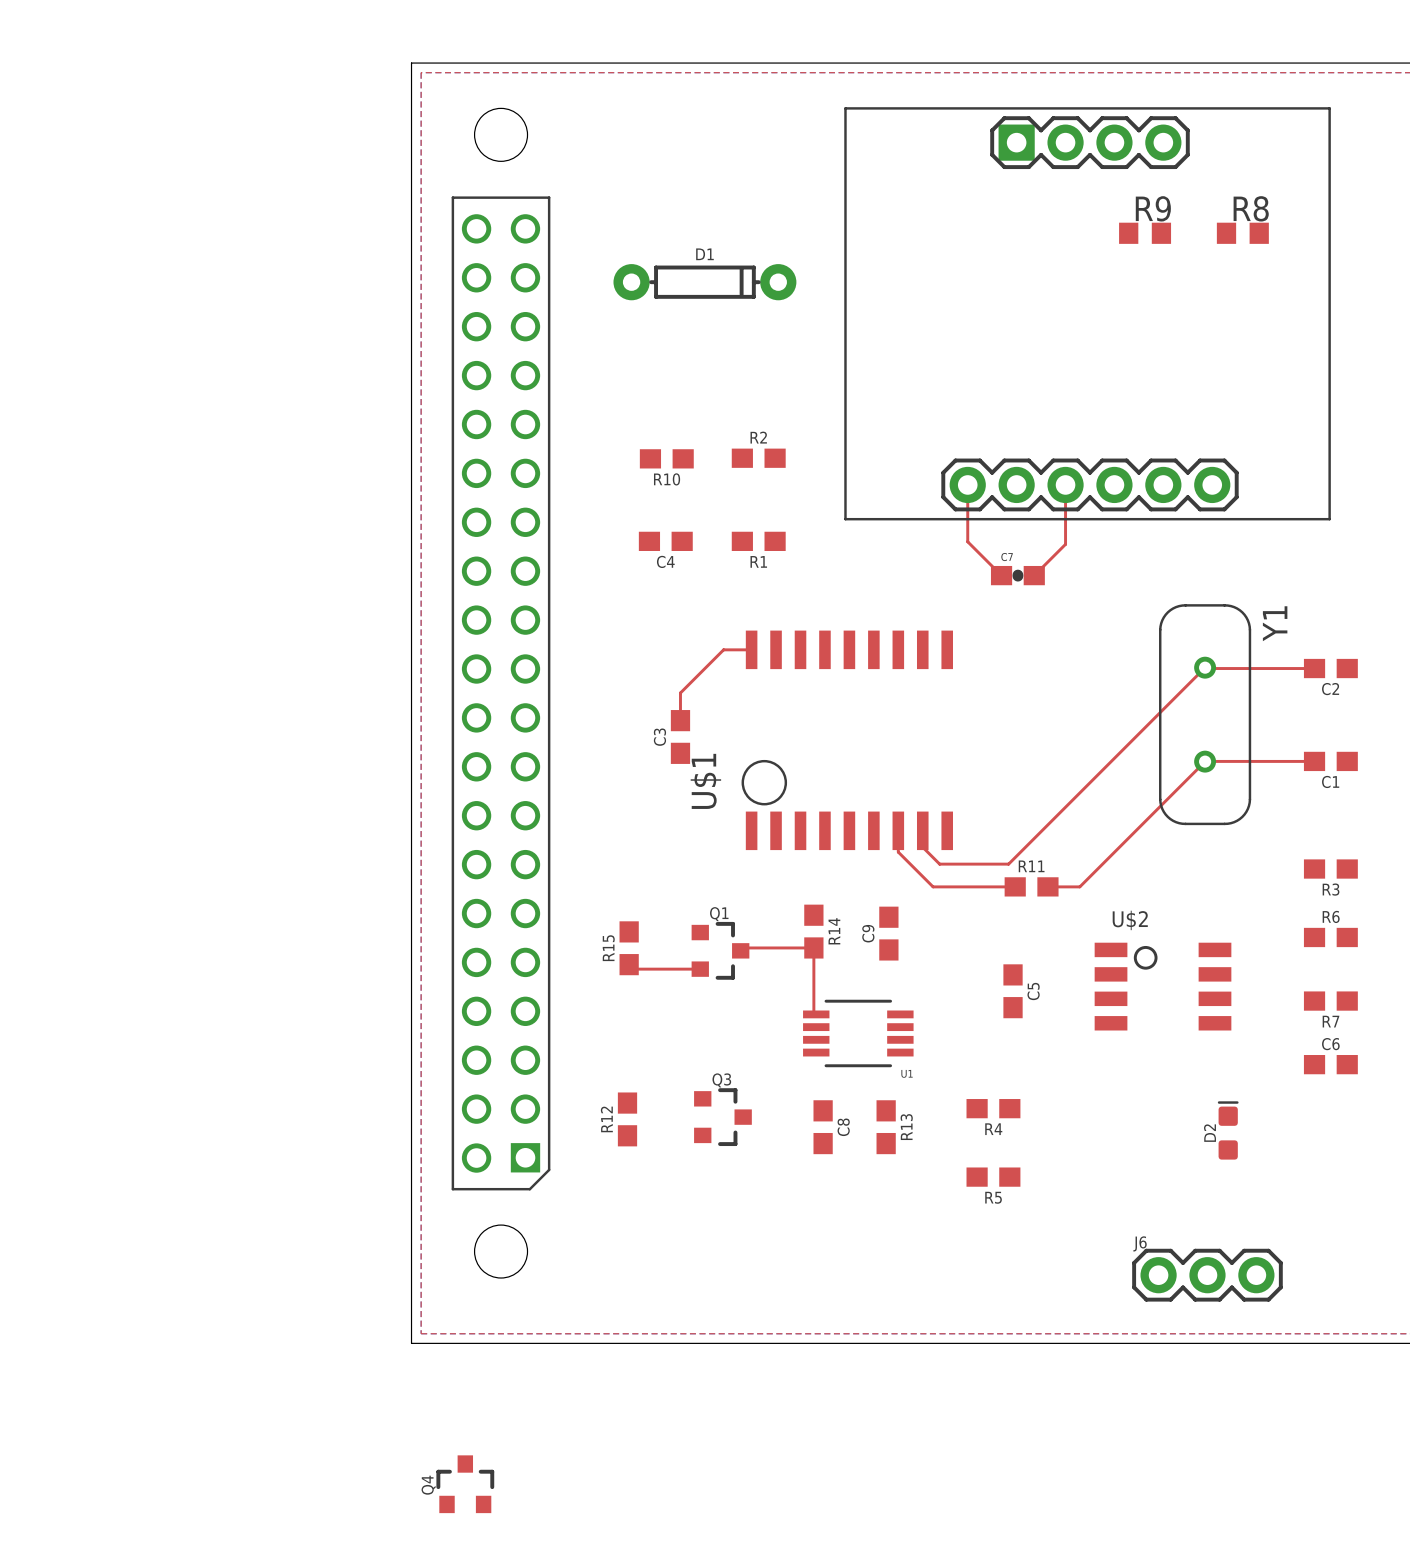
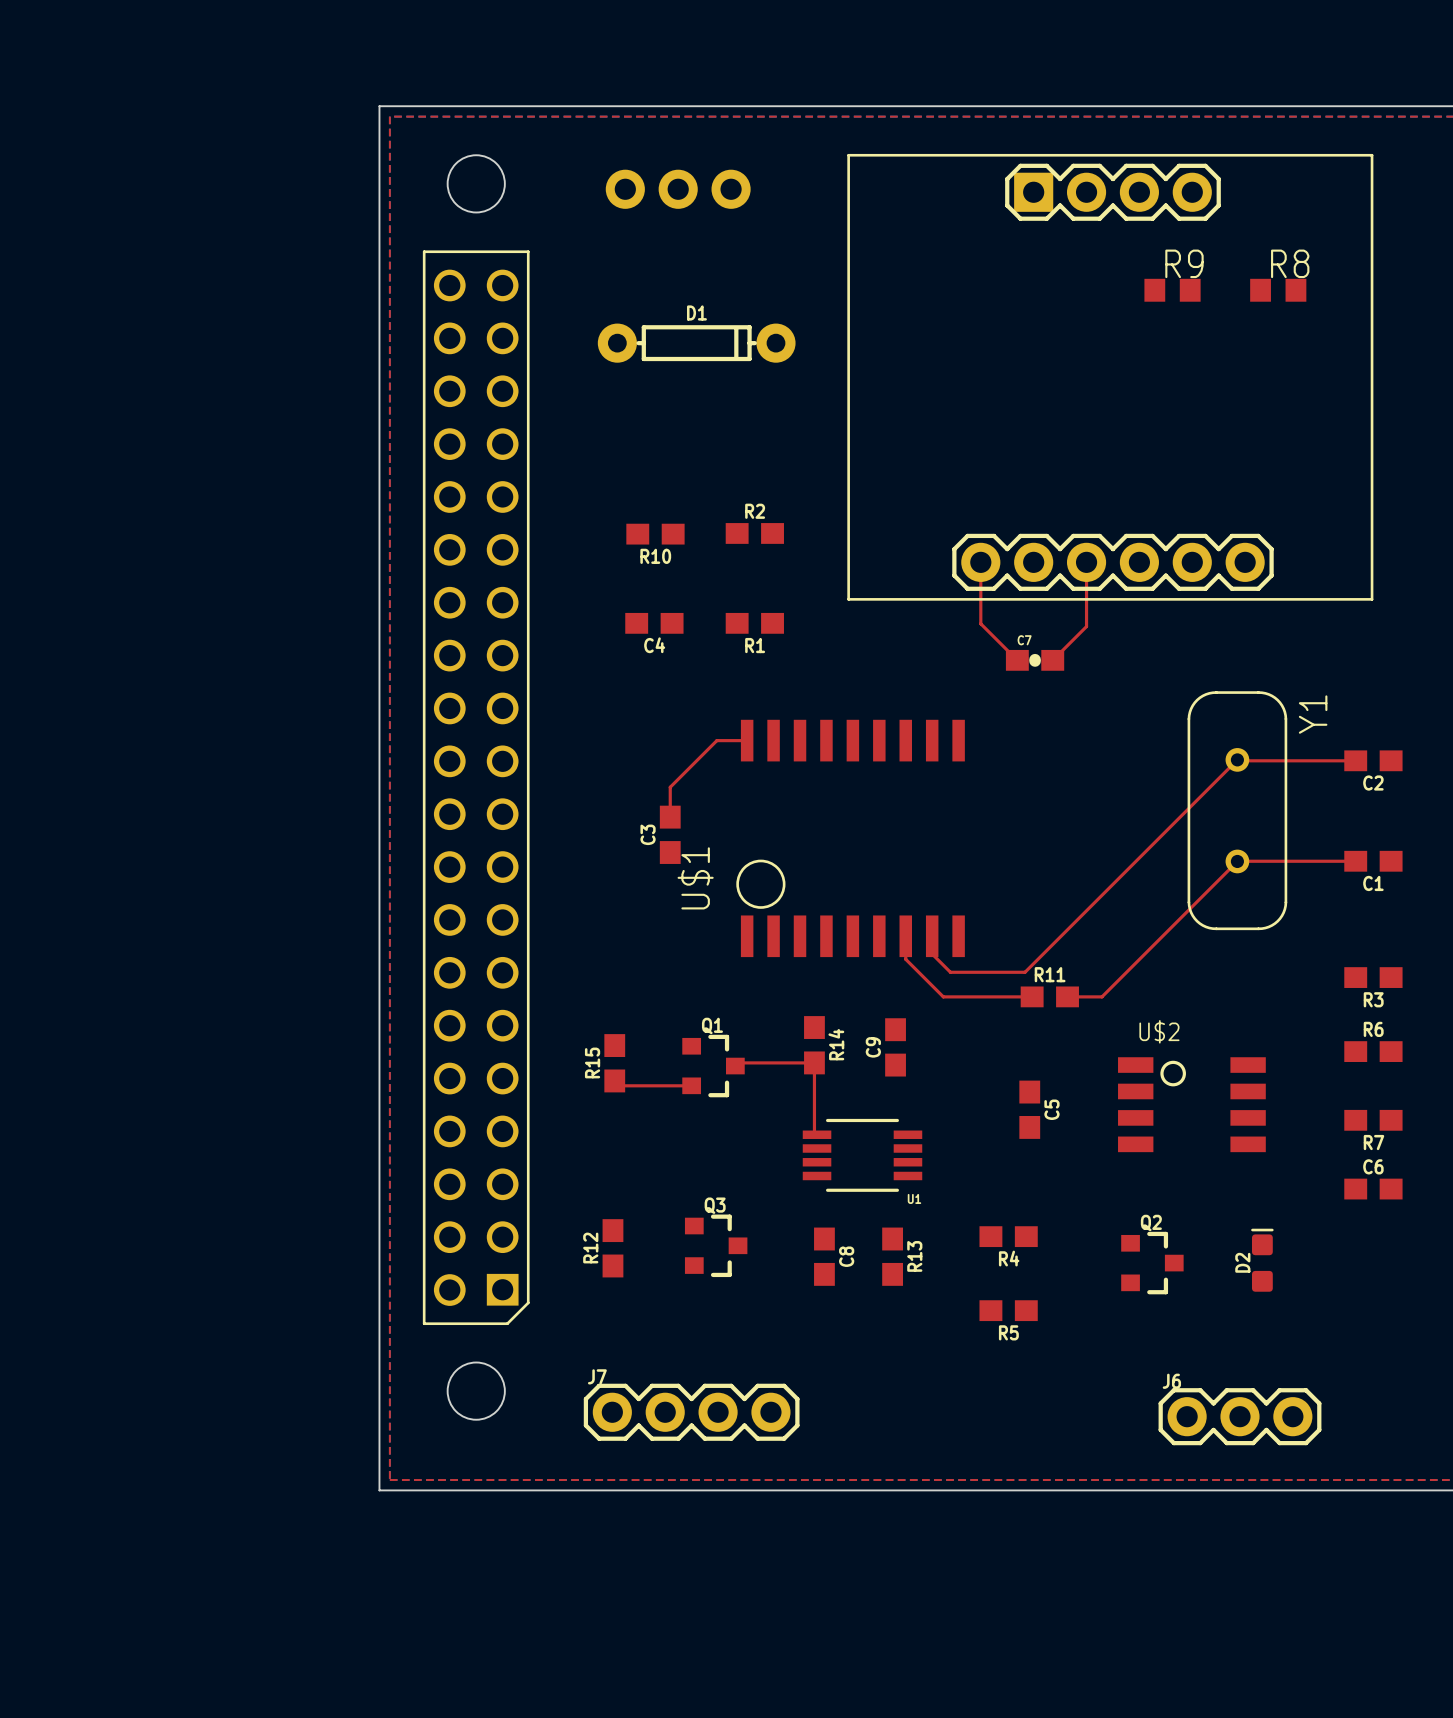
part: none -> (678, 189)
Q2: none -> (1152, 1263)
J7: none -> (691, 1412)
Q4: (465, 1484) -> none

